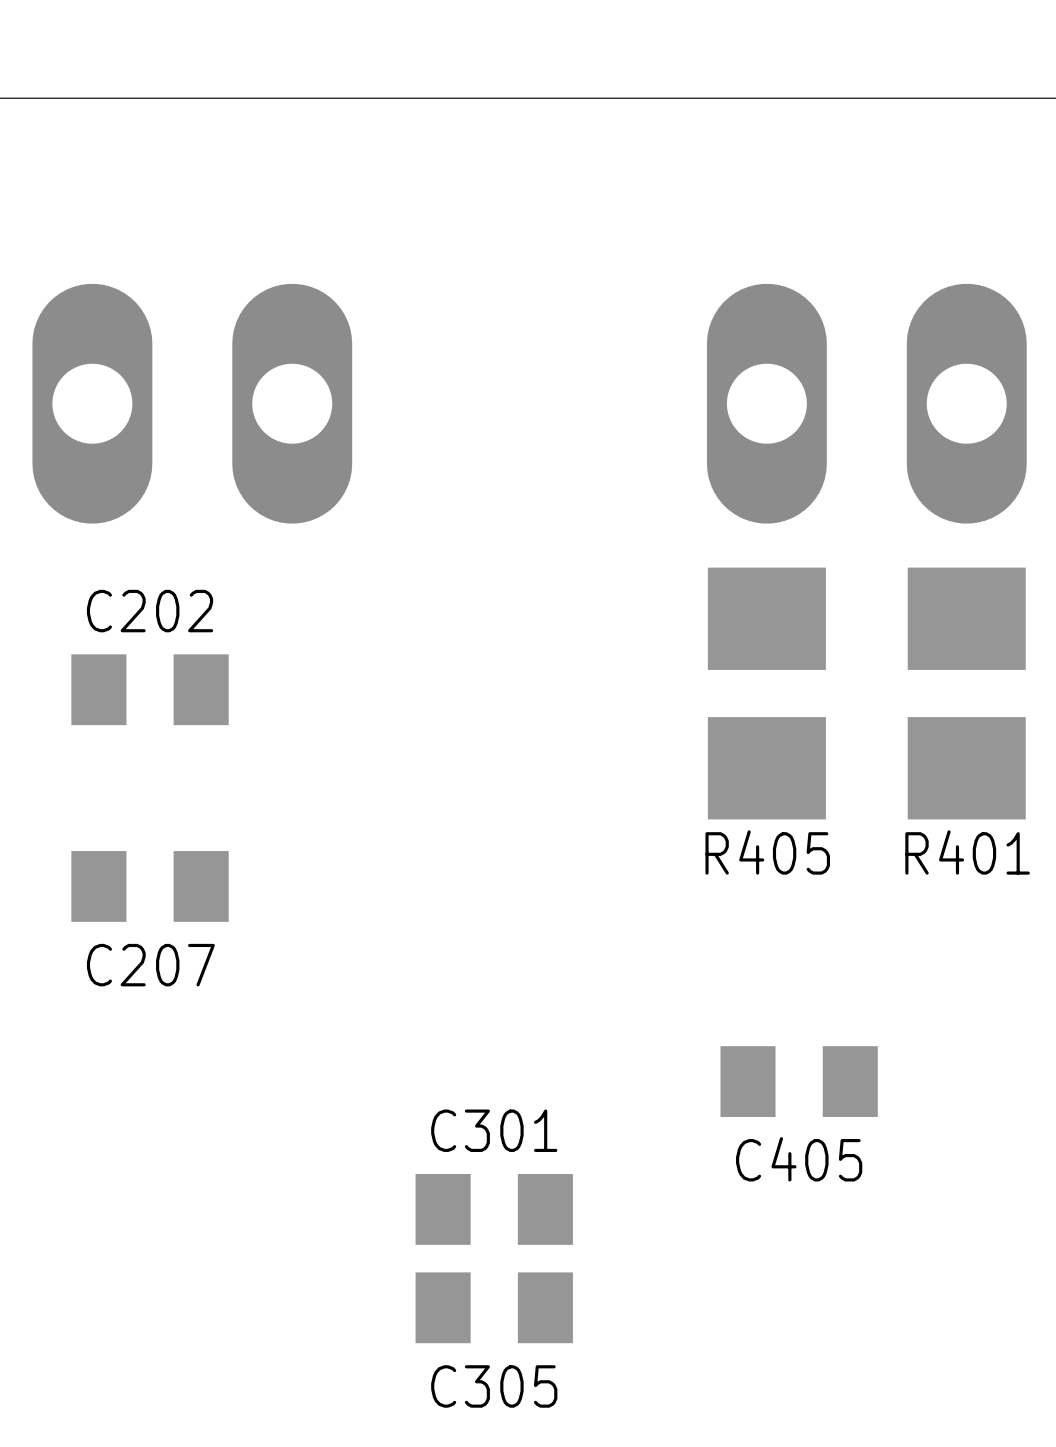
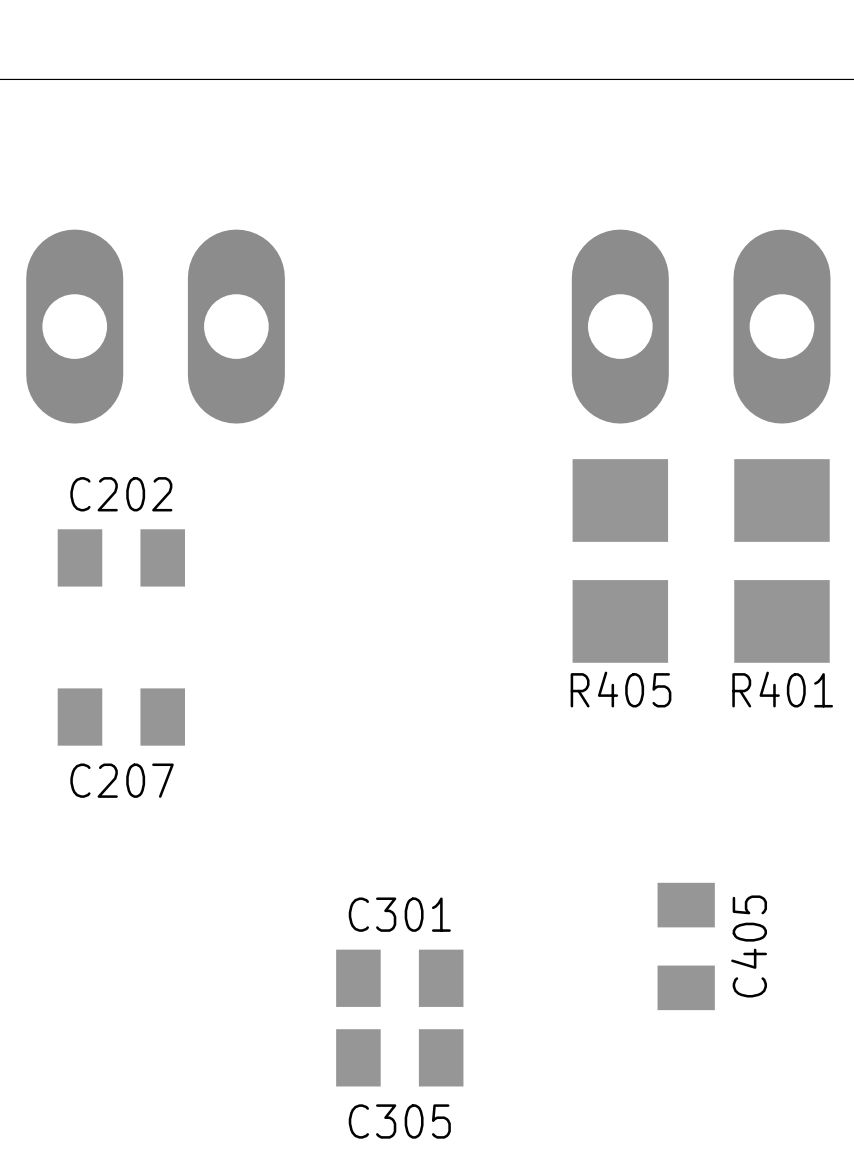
C405 rotation: 0° (799, 1081) -> 90° clockwise (686, 946)
C405 position: (799, 1081) -> (686, 946)

